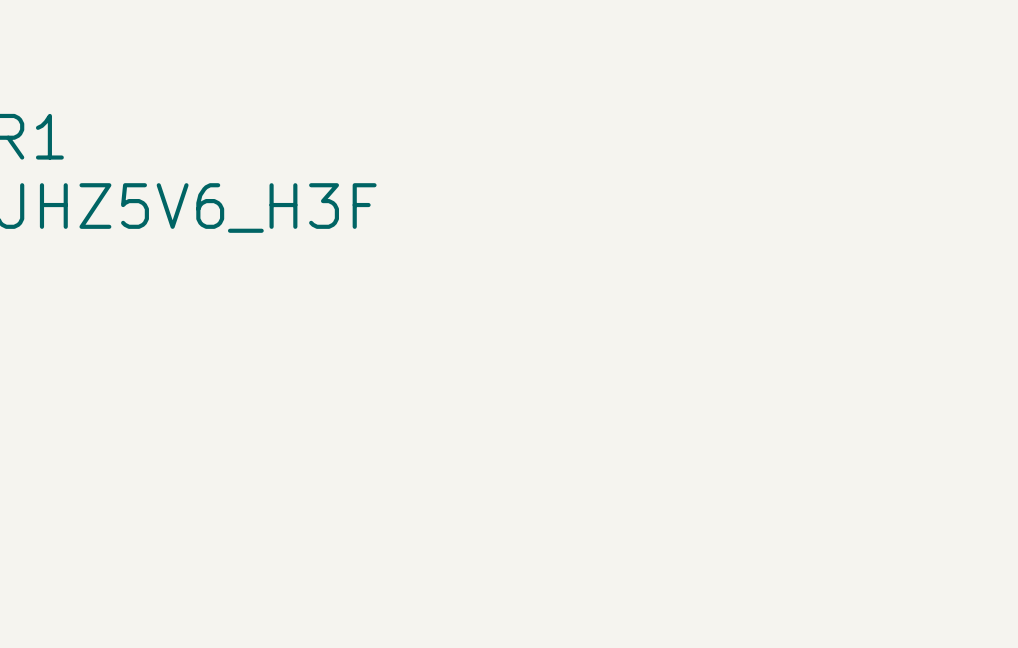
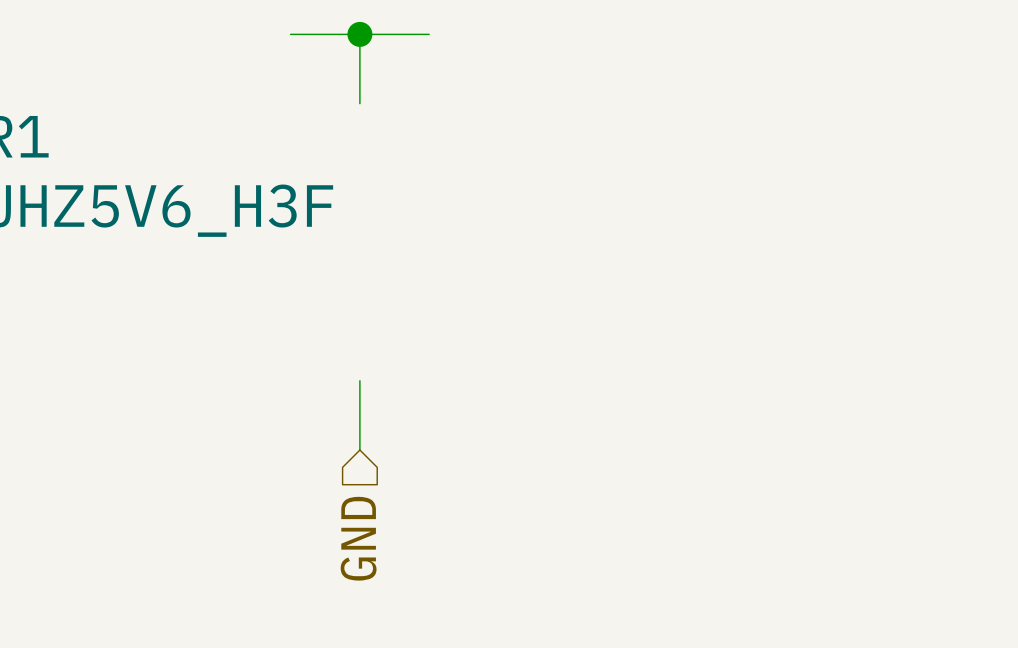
wire: none -> (290, 34) (429, 34)
wire: none -> (359, 34) (359, 103)
junction: none -> (359, 34)
wire: none -> (359, 380) (359, 450)
hierarchical label: none -> GND (358, 538)

